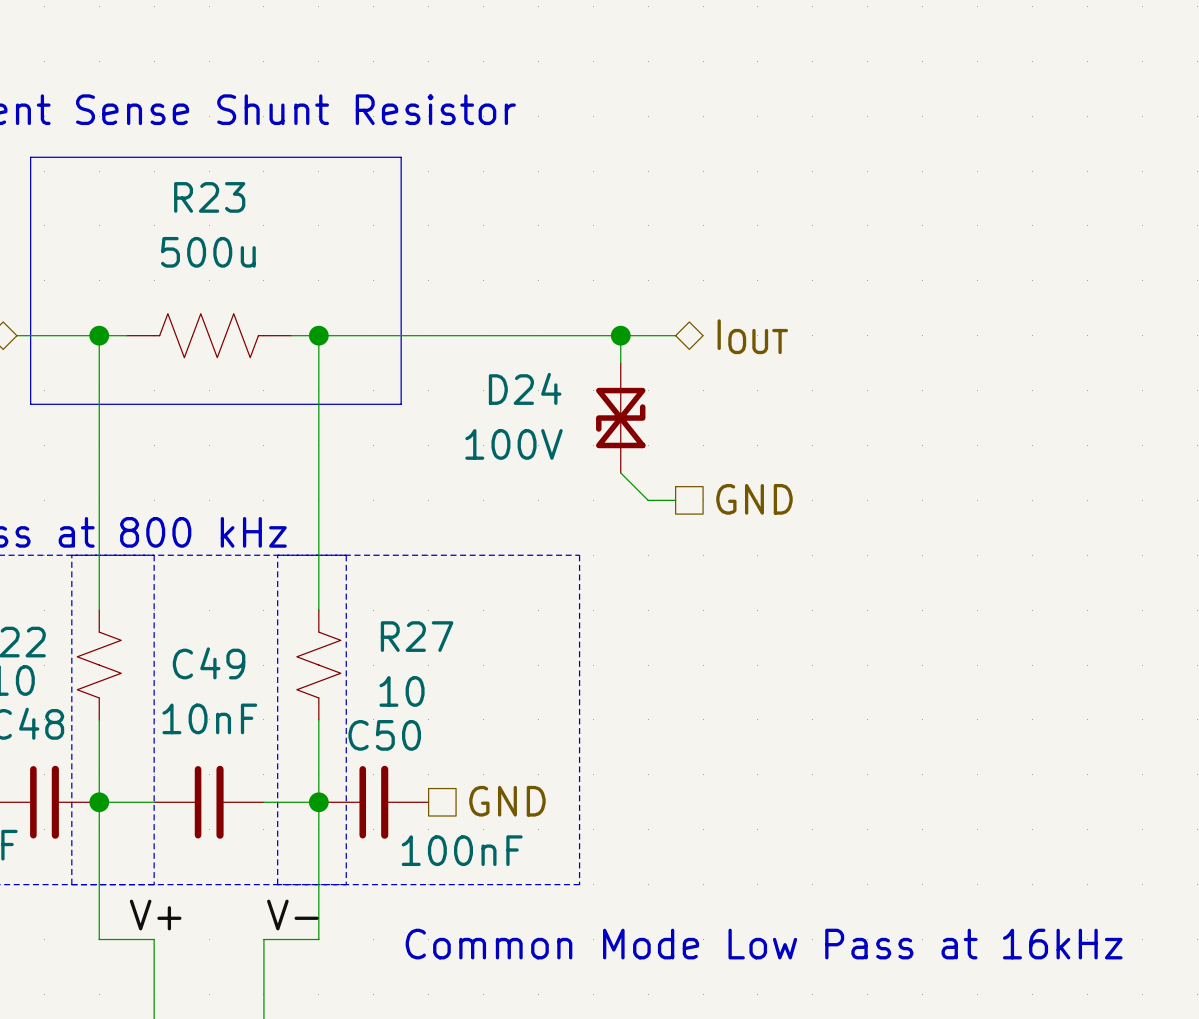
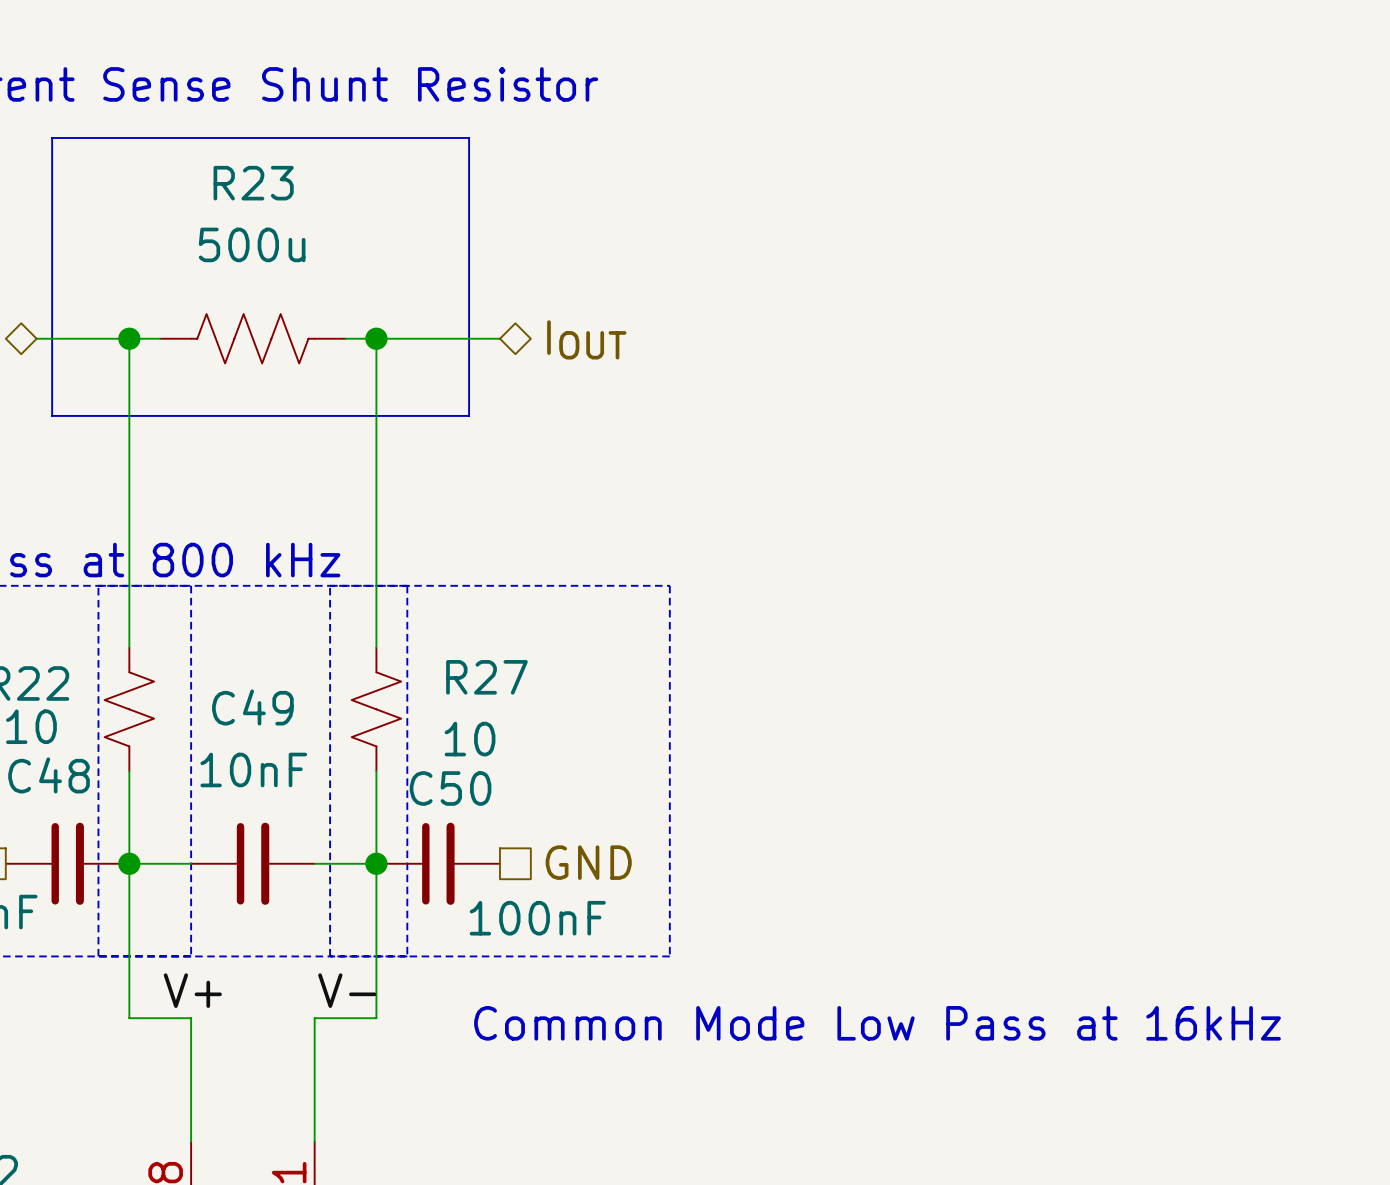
wire: (428, 335) (675, 335) -> none
wire: (620, 335) (620, 363) -> none
junction: (620, 335) -> none
hierarchical label position: IOUT (752, 336) -> IOUT (586, 339)
D24: 100V (620, 418) -> none
wire: (620, 472) (648, 500) (675, 500) -> none
hierarchical label: GND (754, 499) -> none

